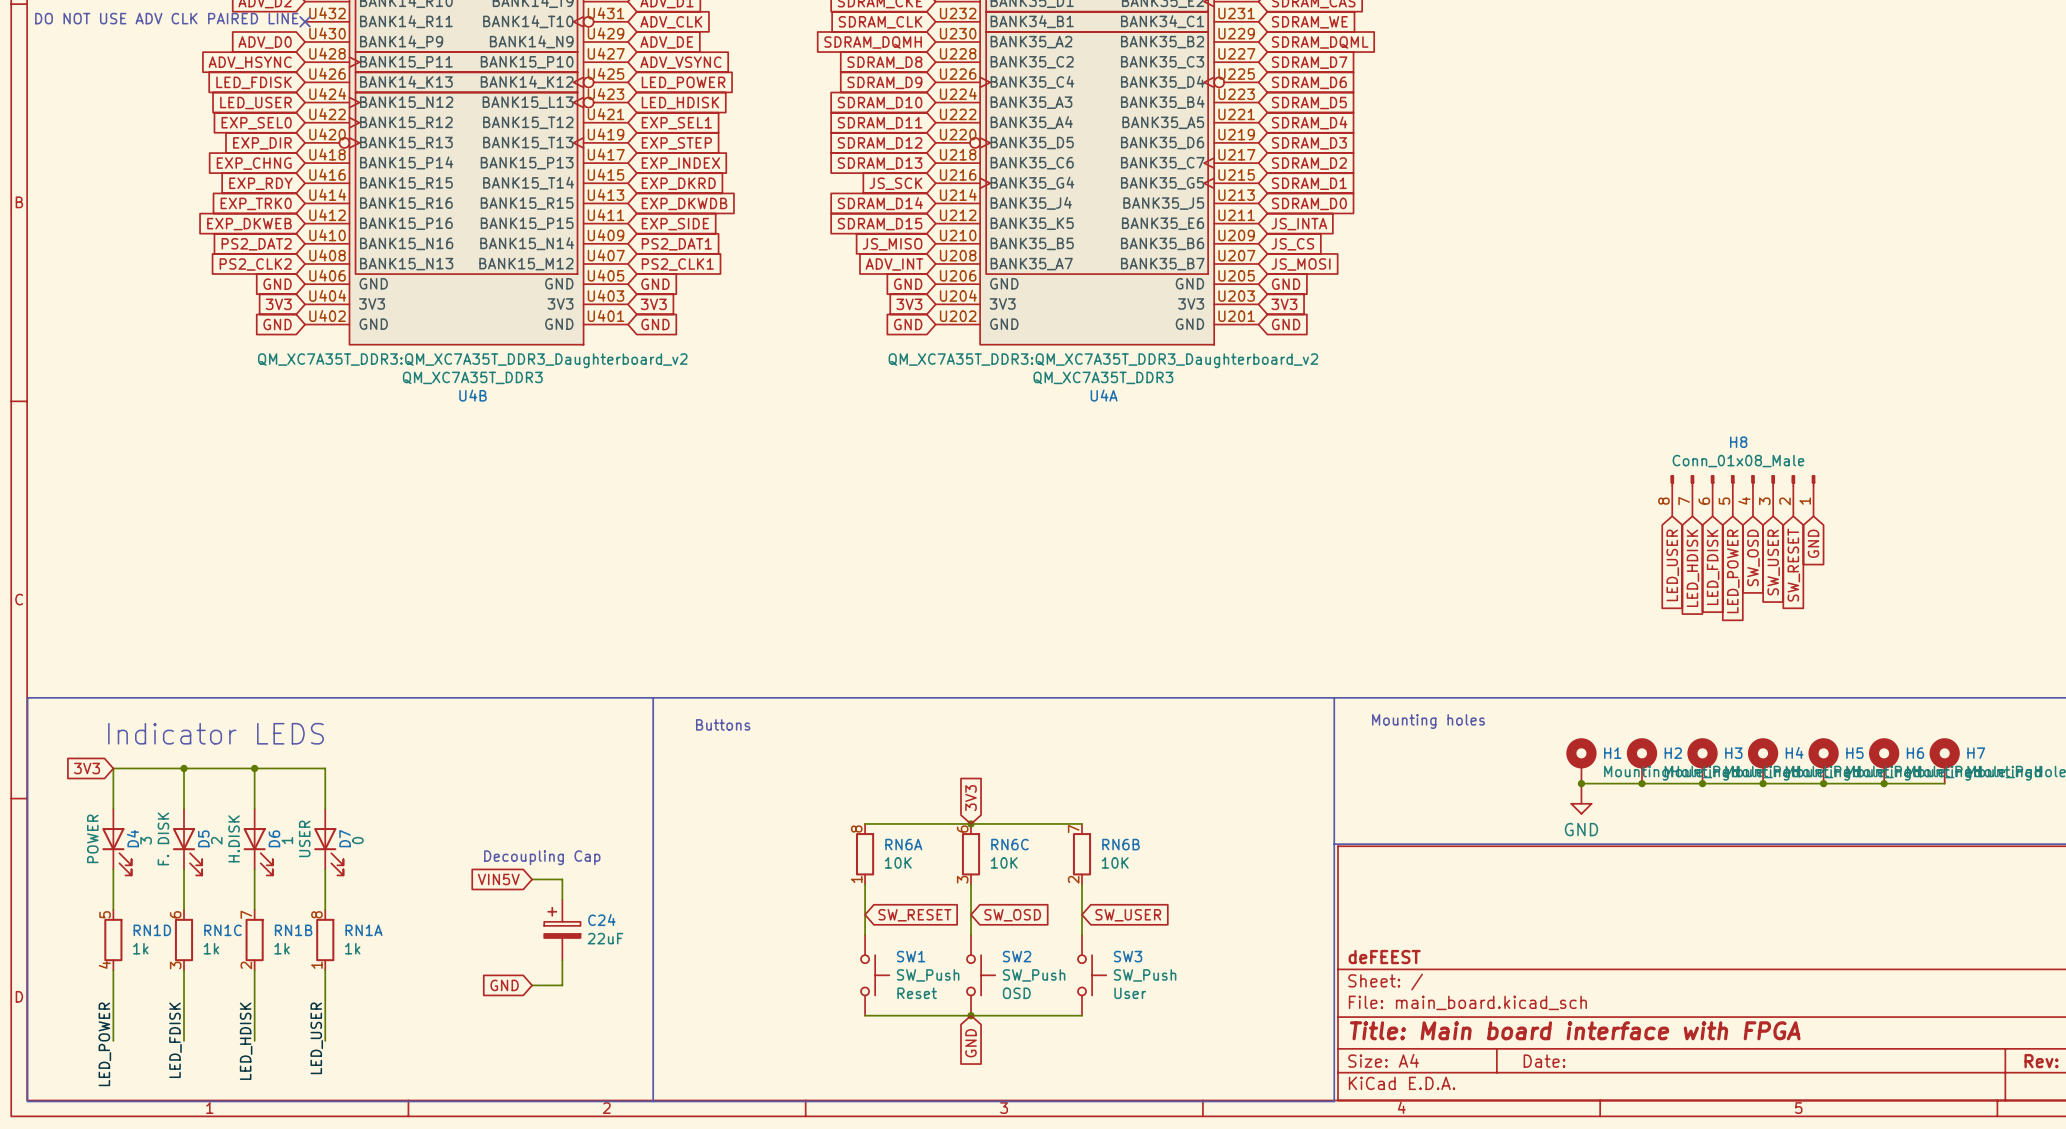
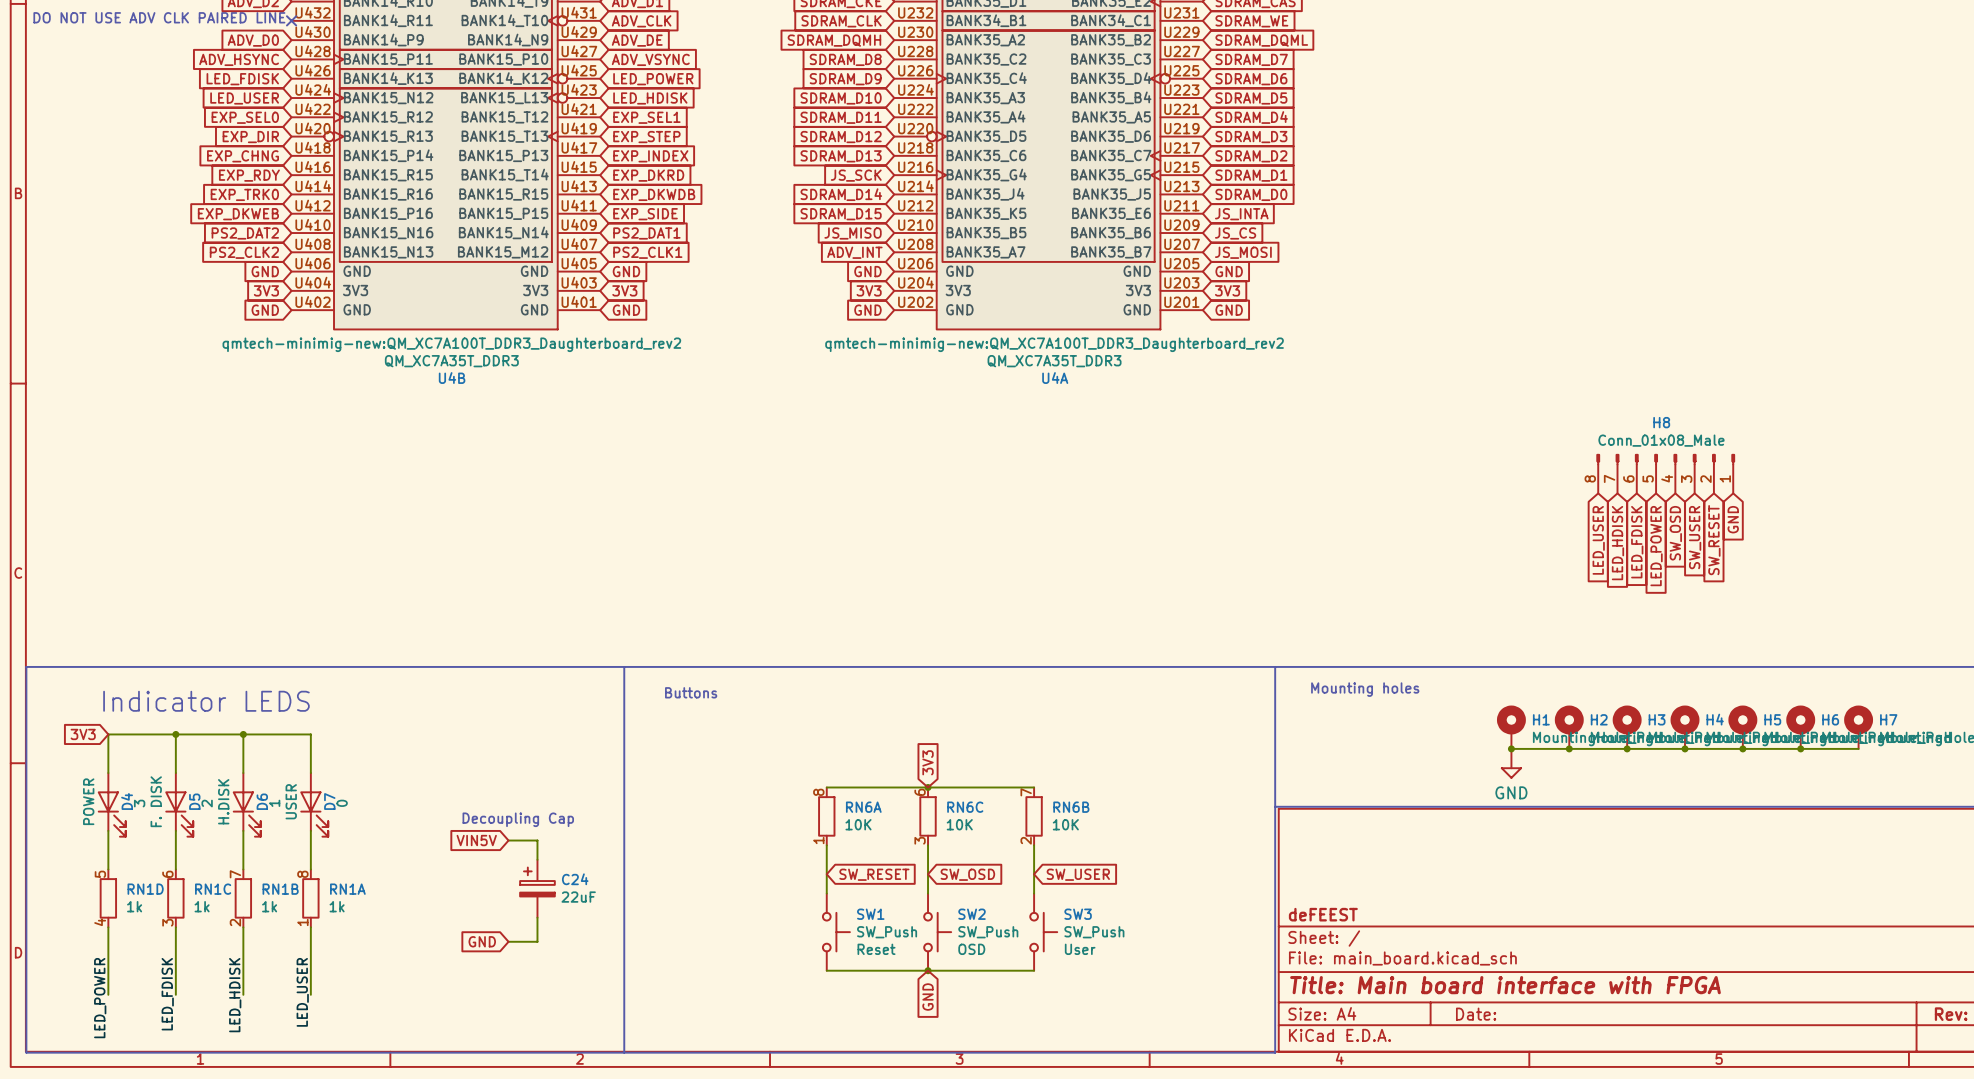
U4B text: QM_XC7A35T_DDR3:QM_XC7A35T_DDR3_Daughterboard_v2 (472, 360) -> qmtech-minimig-new:QM_XC7A100T_DDR3_Daughterboard_rev2 (451, 344)
U4A text: QM_XC7A35T_DDR3:QM_XC7A35T_DDR3_Daughterboard_v2 (1103, 360) -> qmtech-minimig-new:QM_XC7A100T_DDR3_Daughterboard_rev2 (1054, 344)

